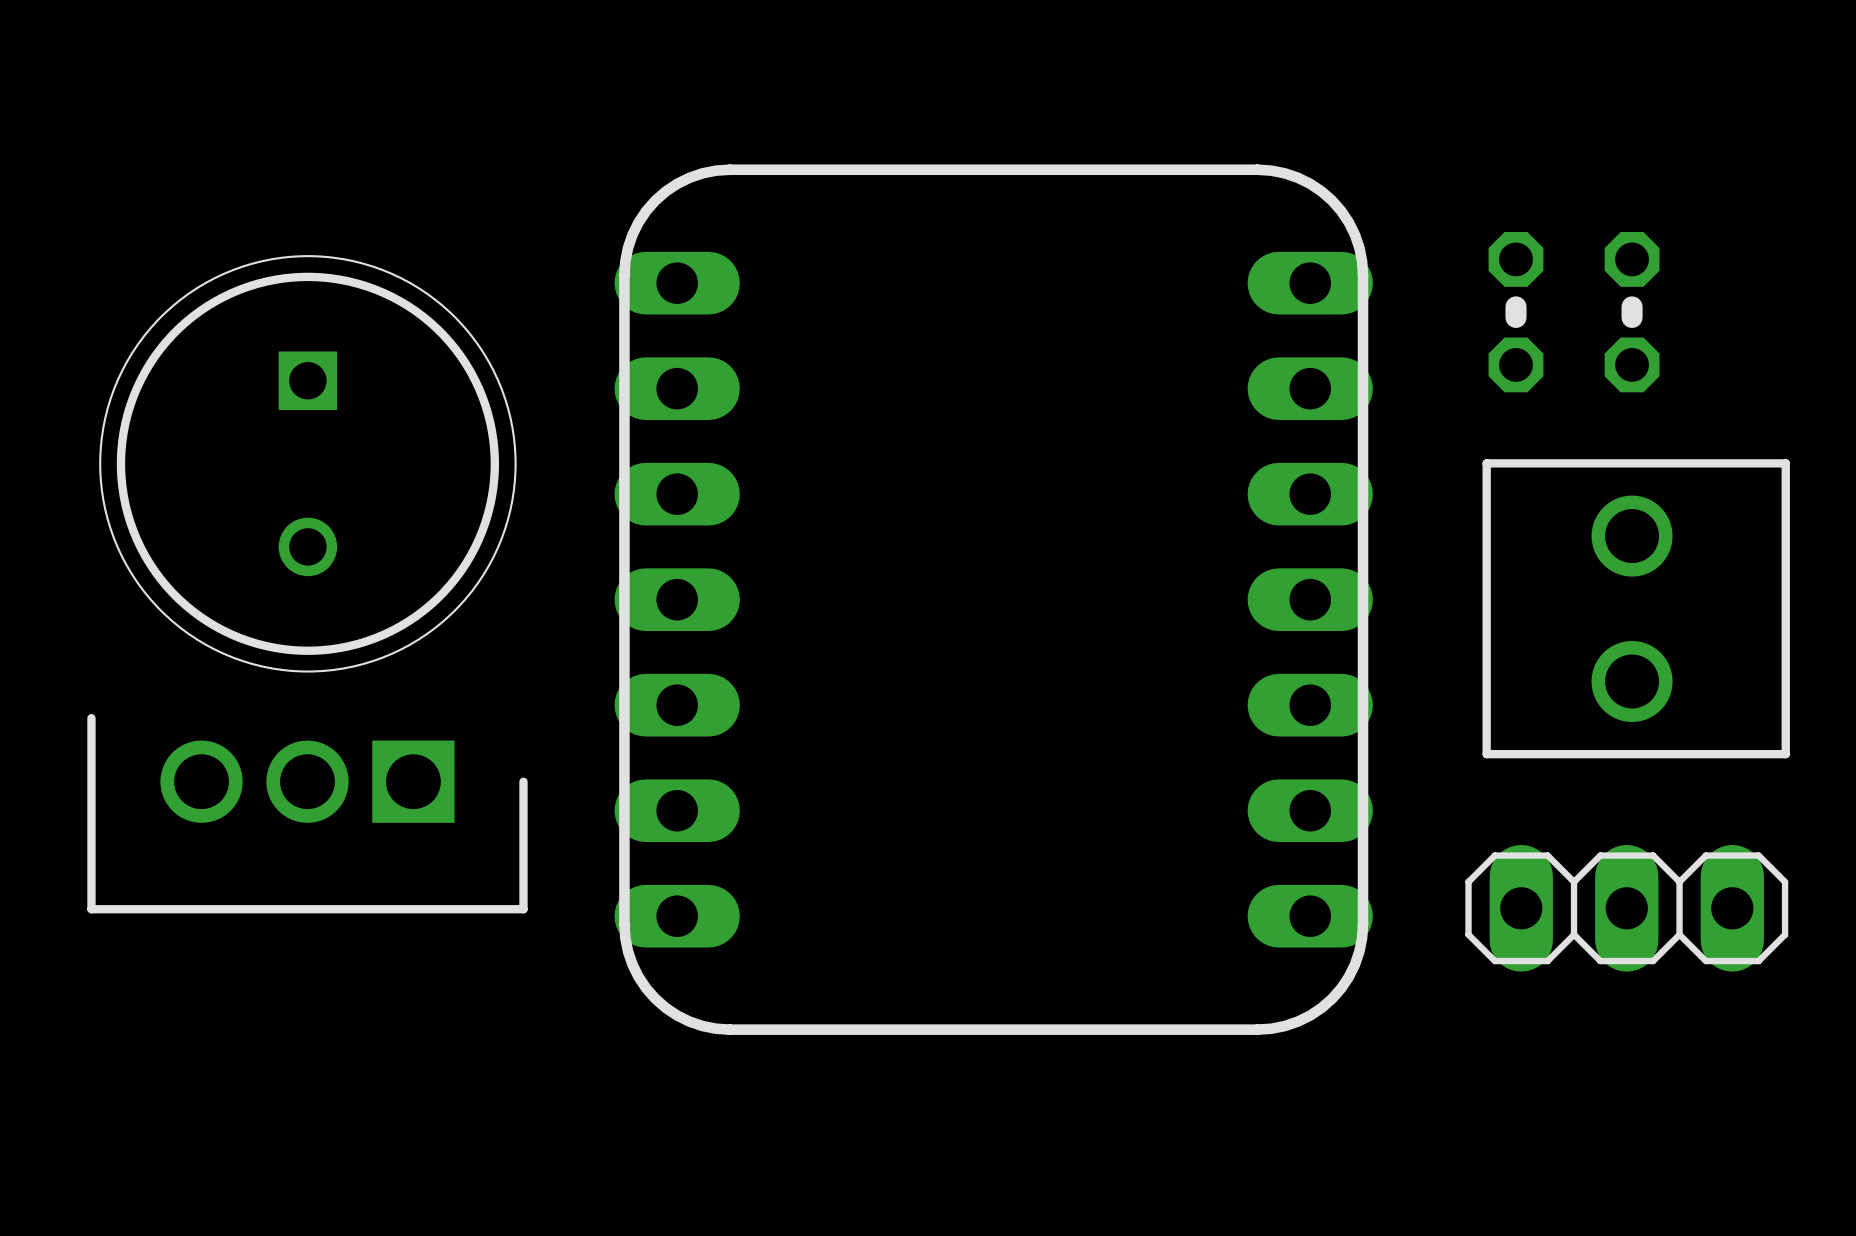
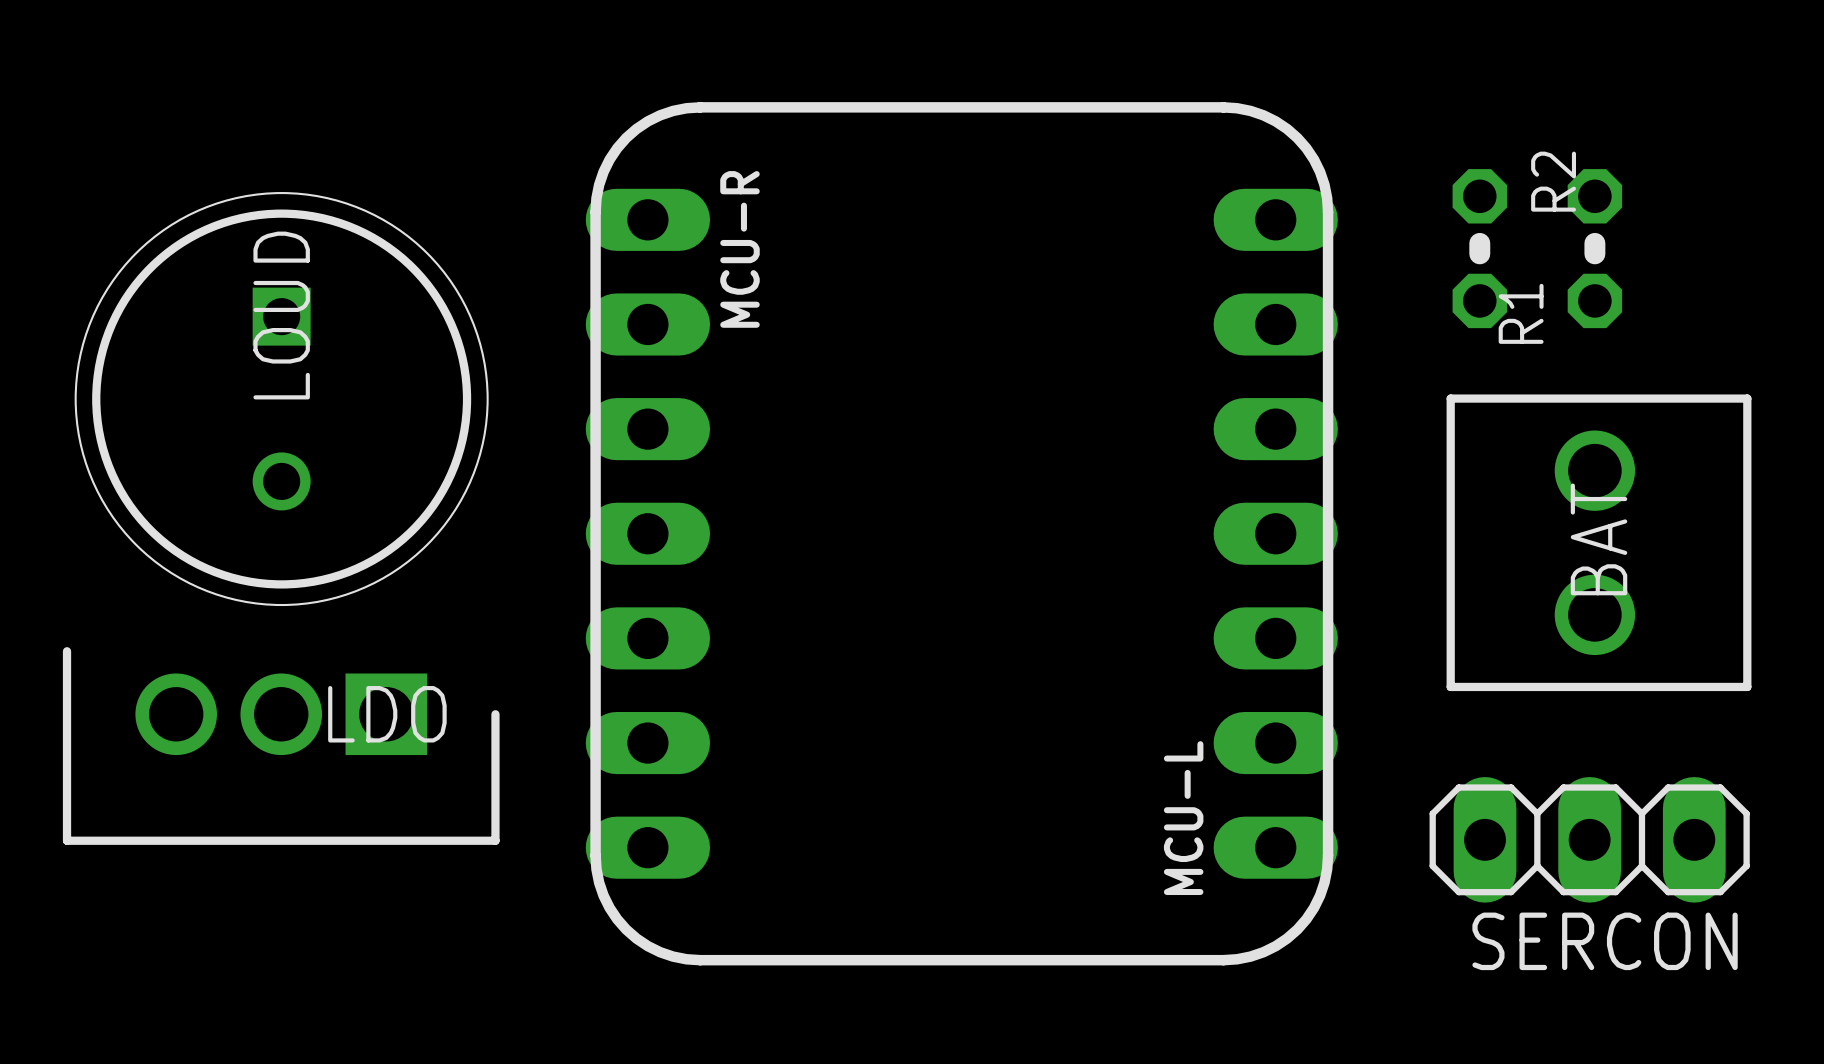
R2 name: none -> R2 (1553, 181)
MCU-R name: none -> MCU-R (739, 249)
LOUD name: none -> LOUD (281, 315)
R1 name: none -> R1 (1521, 313)
BAT name: none -> BAT (1599, 539)
LDO name: none -> LDO (387, 714)
MCU-L name: none -> MCU-L (1183, 818)
SERCON name: none -> SERCON (1605, 941)

